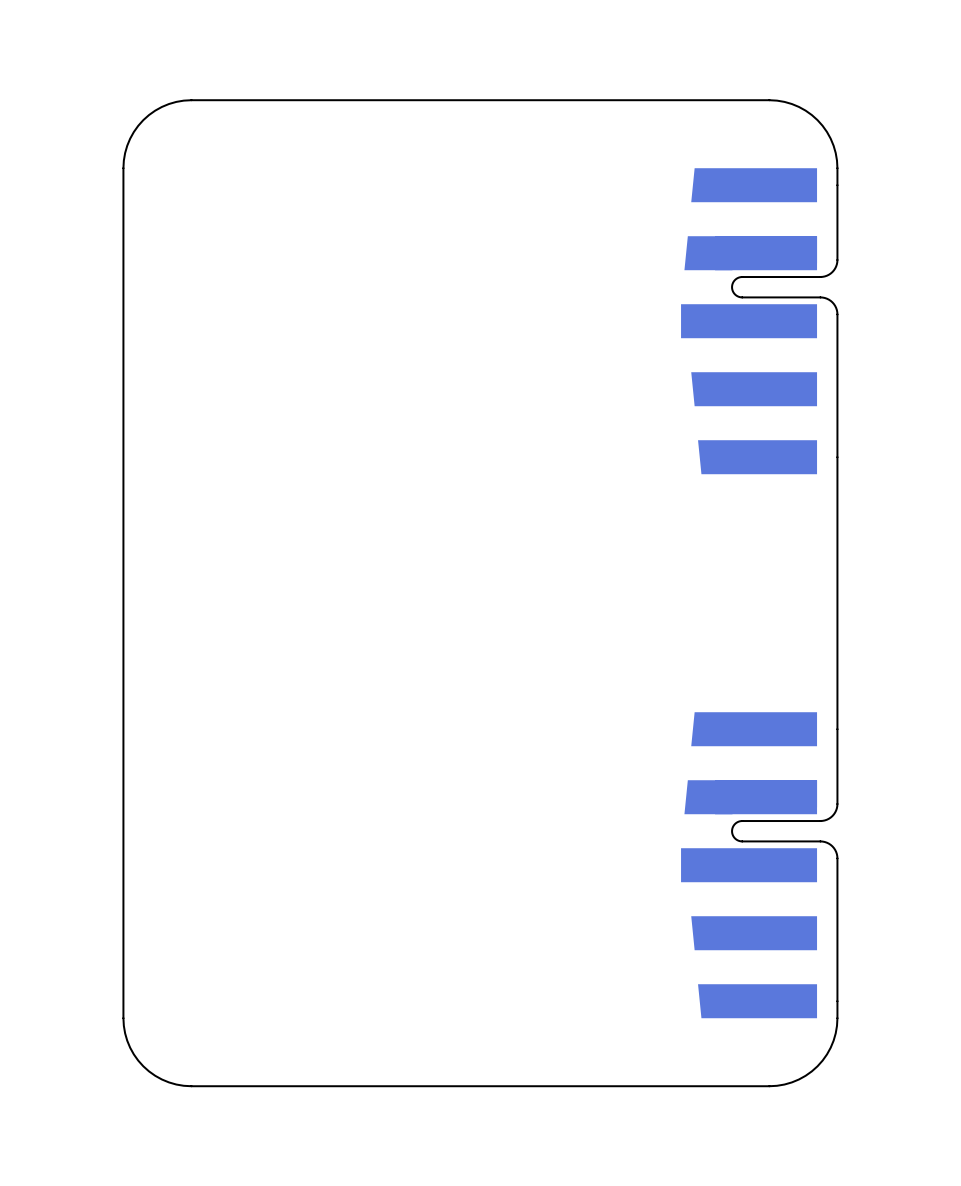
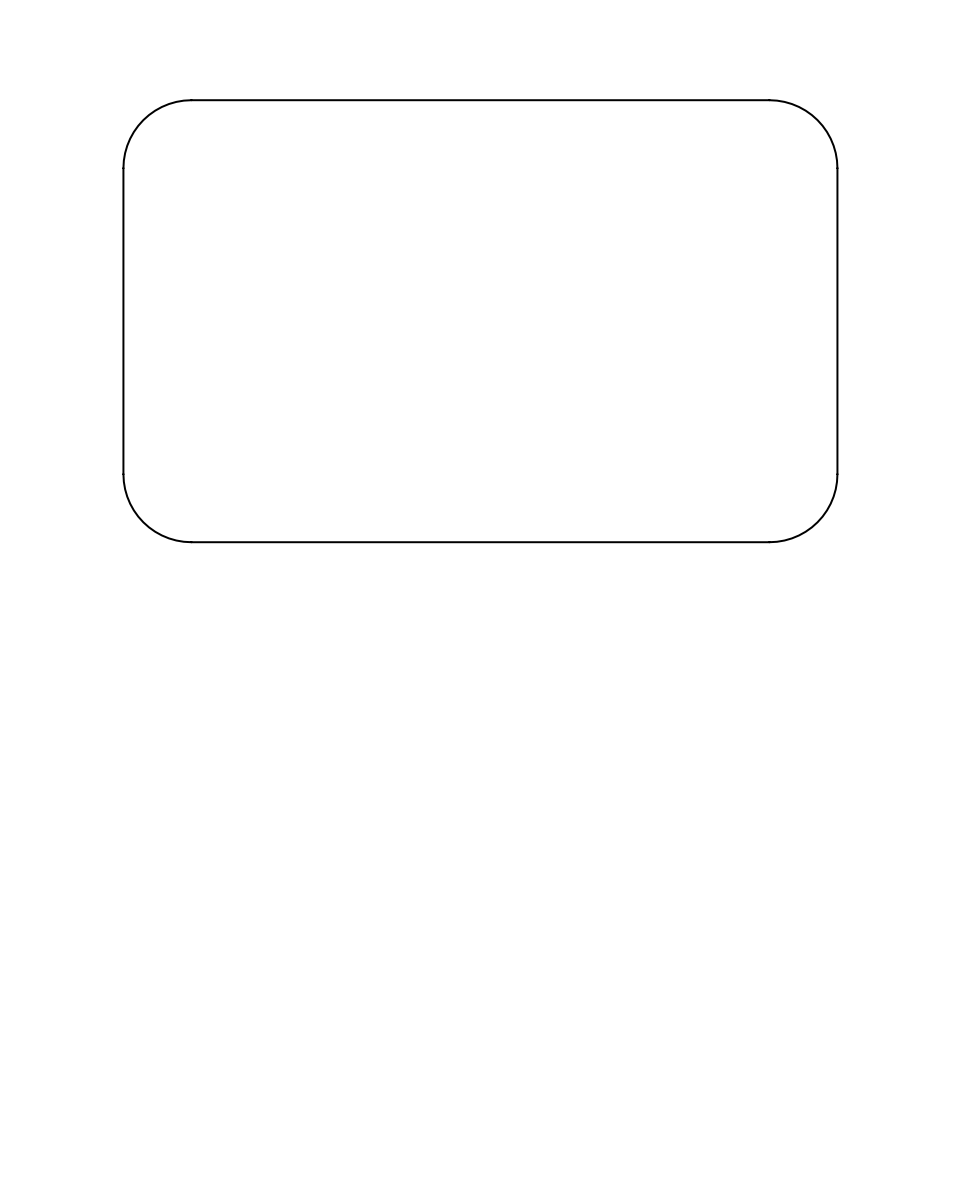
board edge: none -> (837, 185) (837, 457)
part: (759, 321) -> none
board edge: (123, 474) (123, 1018) (125, 1033) (130, 1047) (138, 1060) (149, 1071) (168, 1082) (191, 1086) (777, 1085) (798, 1079) (811, 1071) (822, 1060) (830, 1047) (835, 1033) (837, 1001) -> (123, 474) (127, 496) (133, 510) (143, 522) (155, 531) (168, 538) (191, 542) (777, 541) (798, 535) (817, 522) (830, 503) (835, 489) (837, 474)
board edge: (837, 474) (837, 729) -> none
part: (759, 865) -> none

